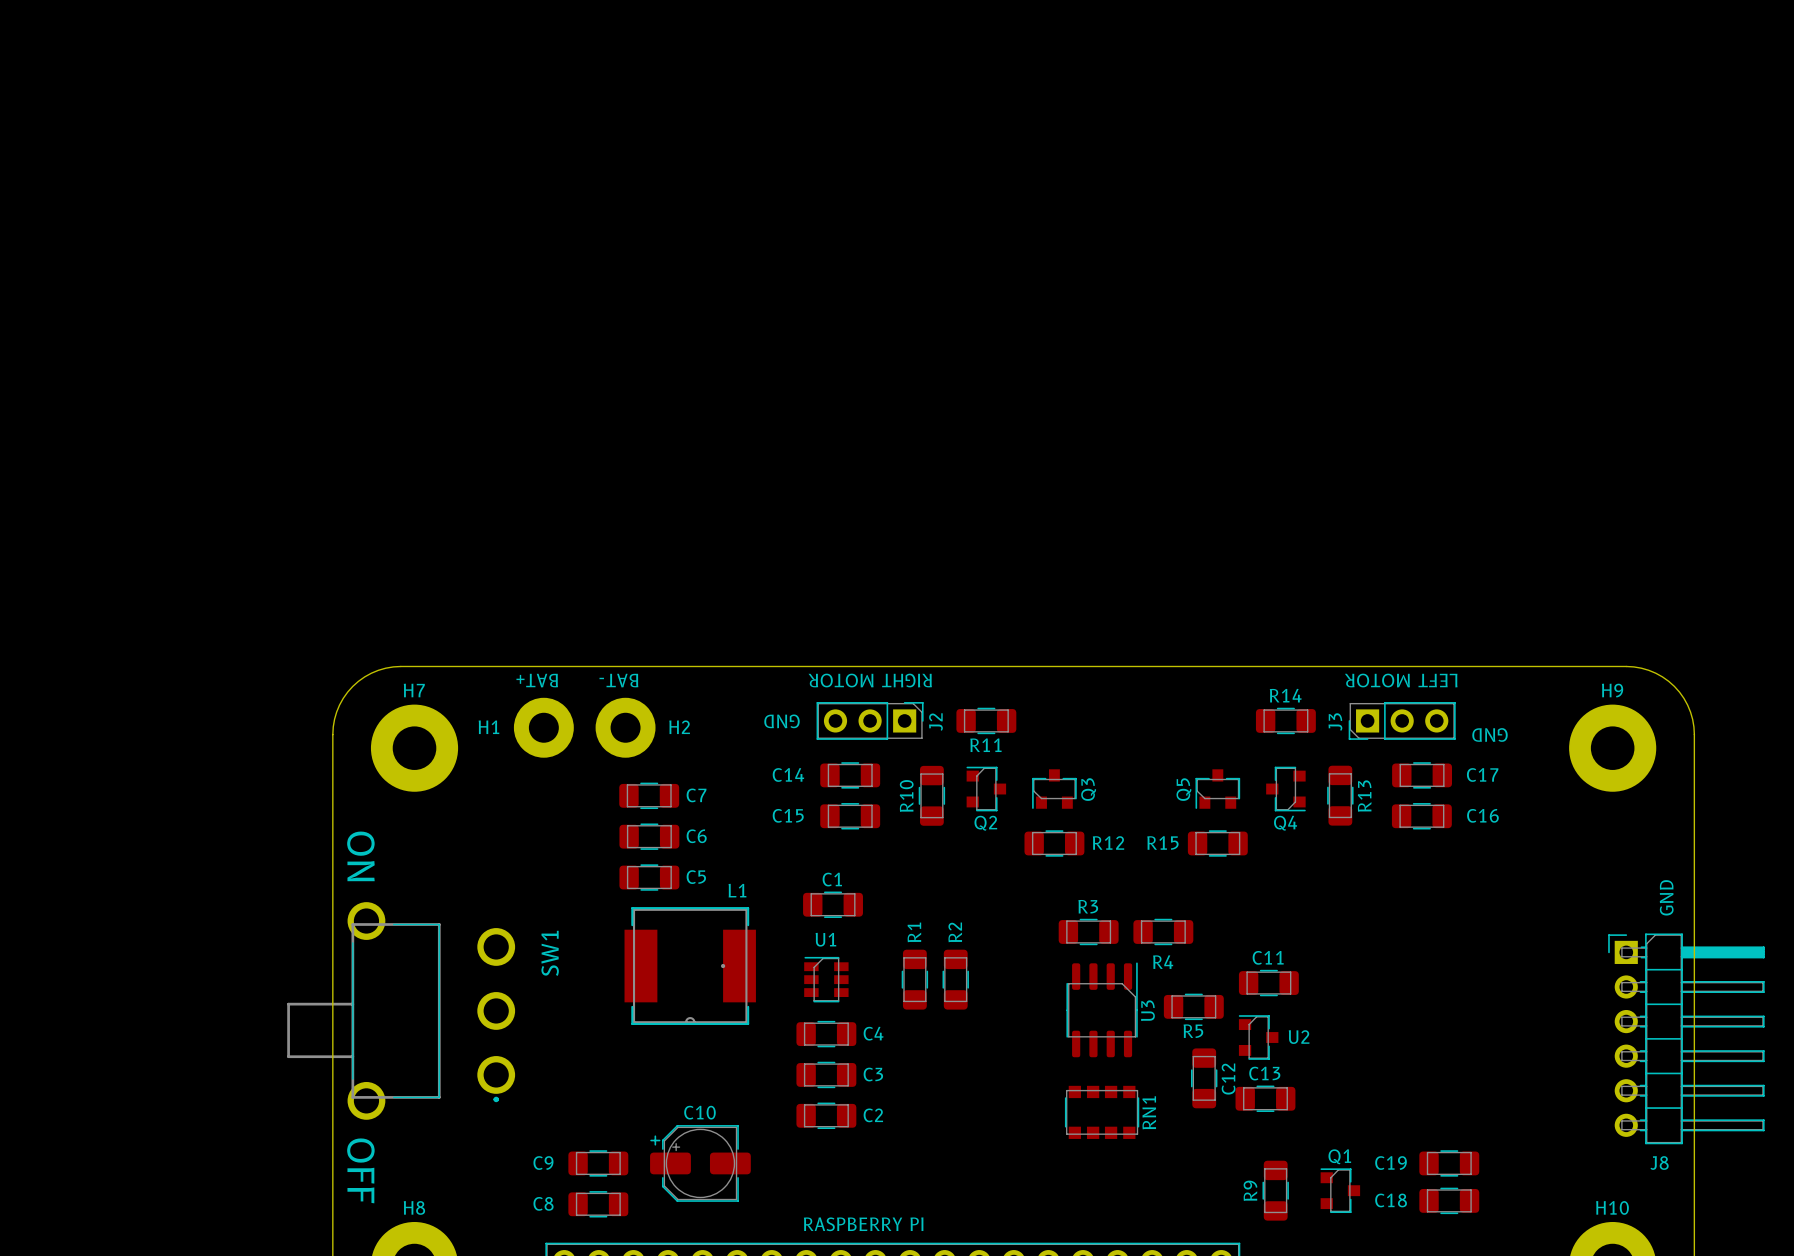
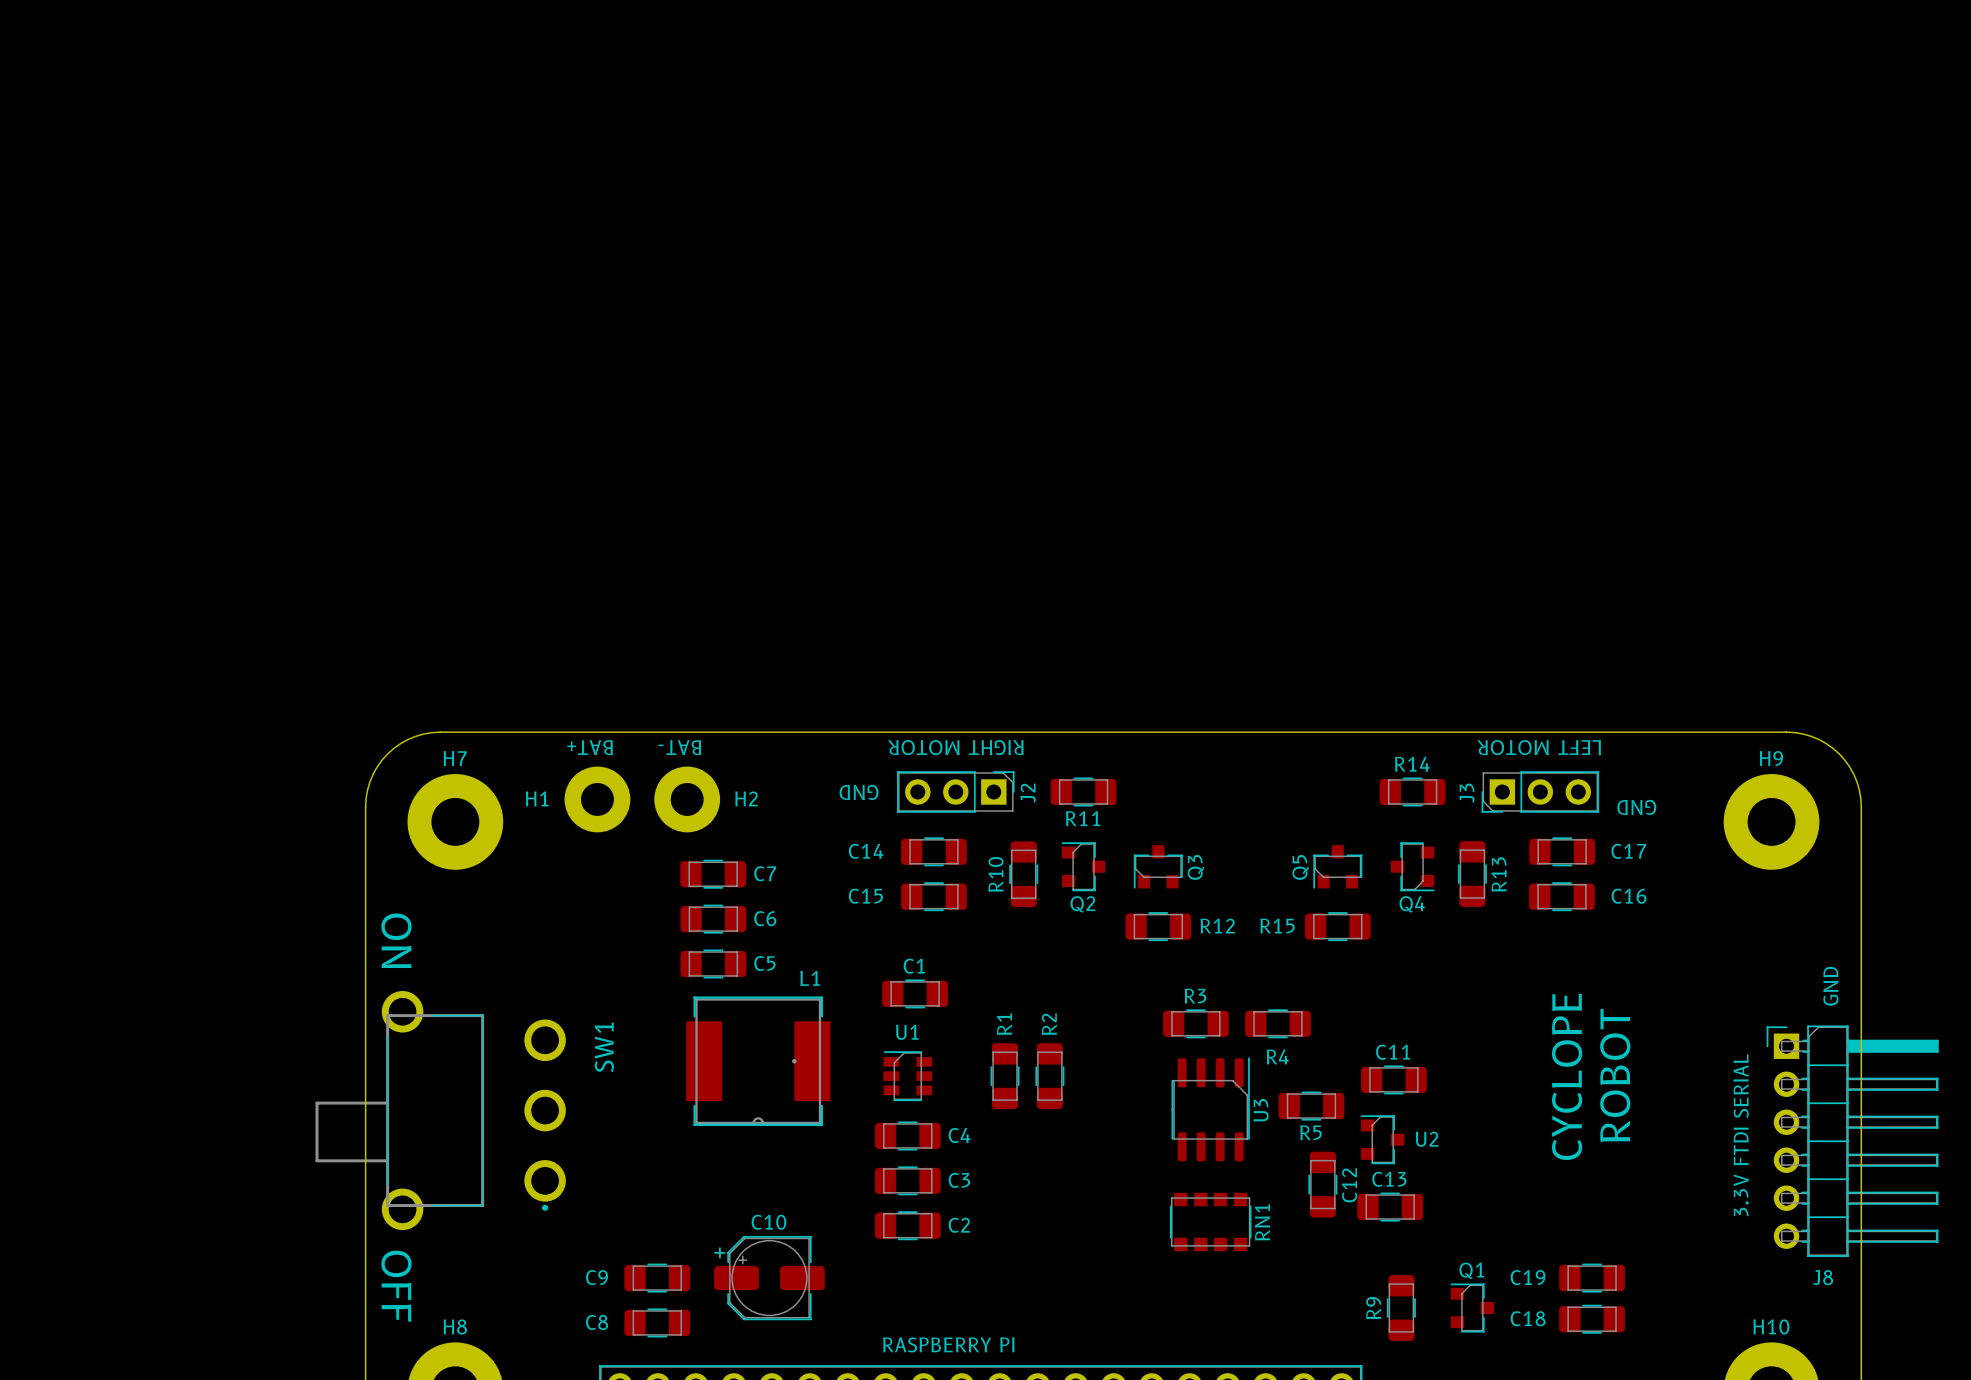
text: none -> ROBOT (1615, 1075)
text: none -> CYCLOPE (1567, 1076)
text: none -> 3.3V FTDI SERIAL (1741, 1135)

